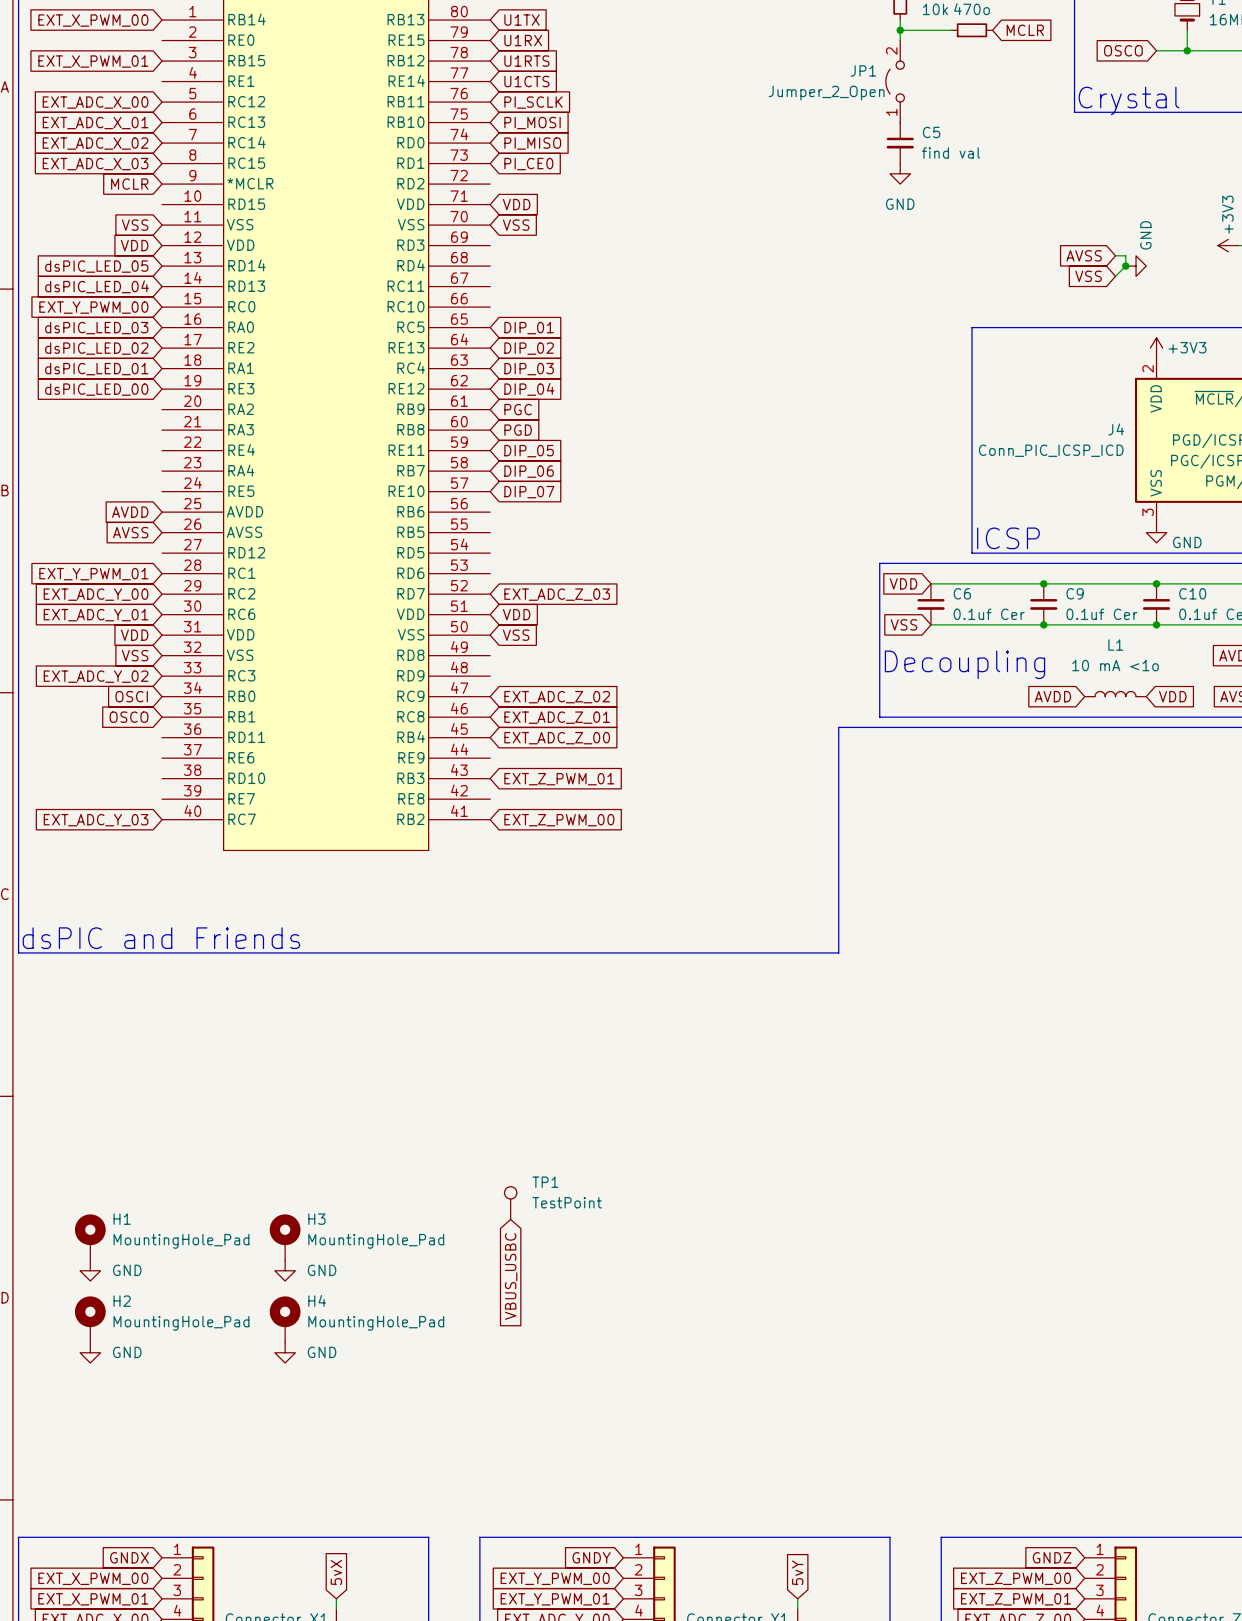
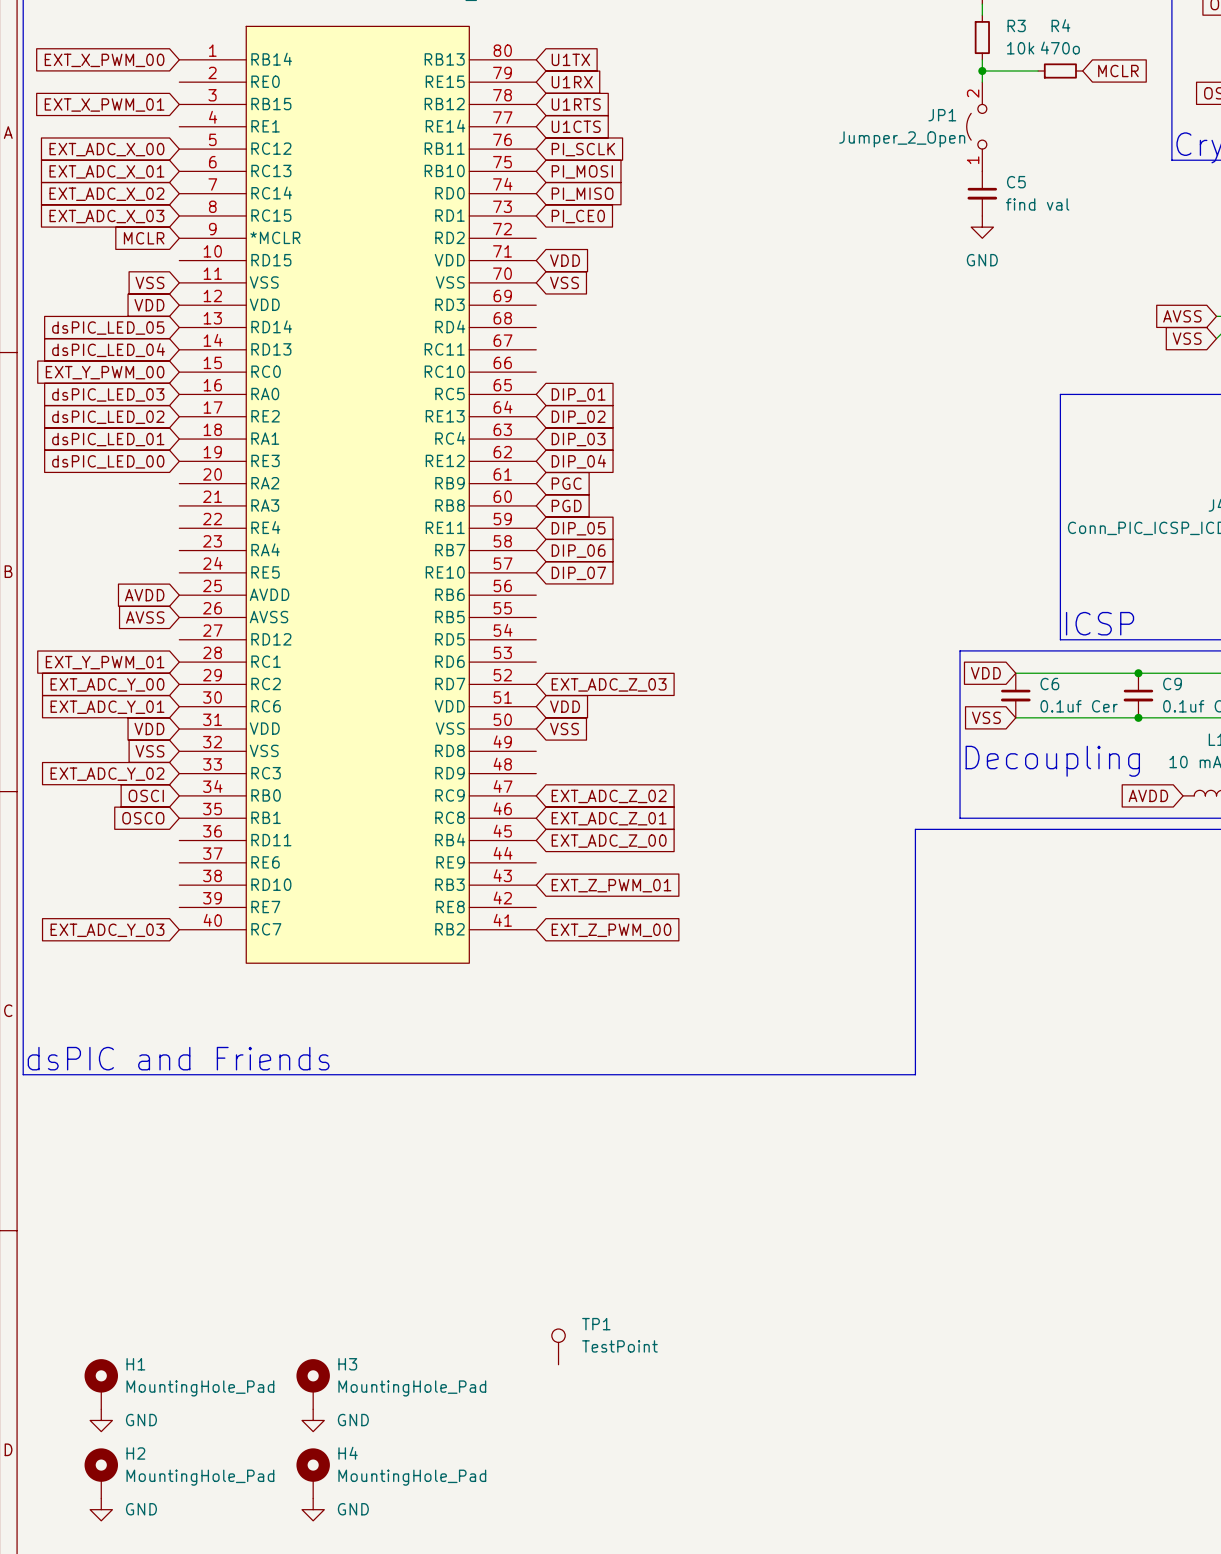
global label: VBUS_USBC (511, 1276) -> none

